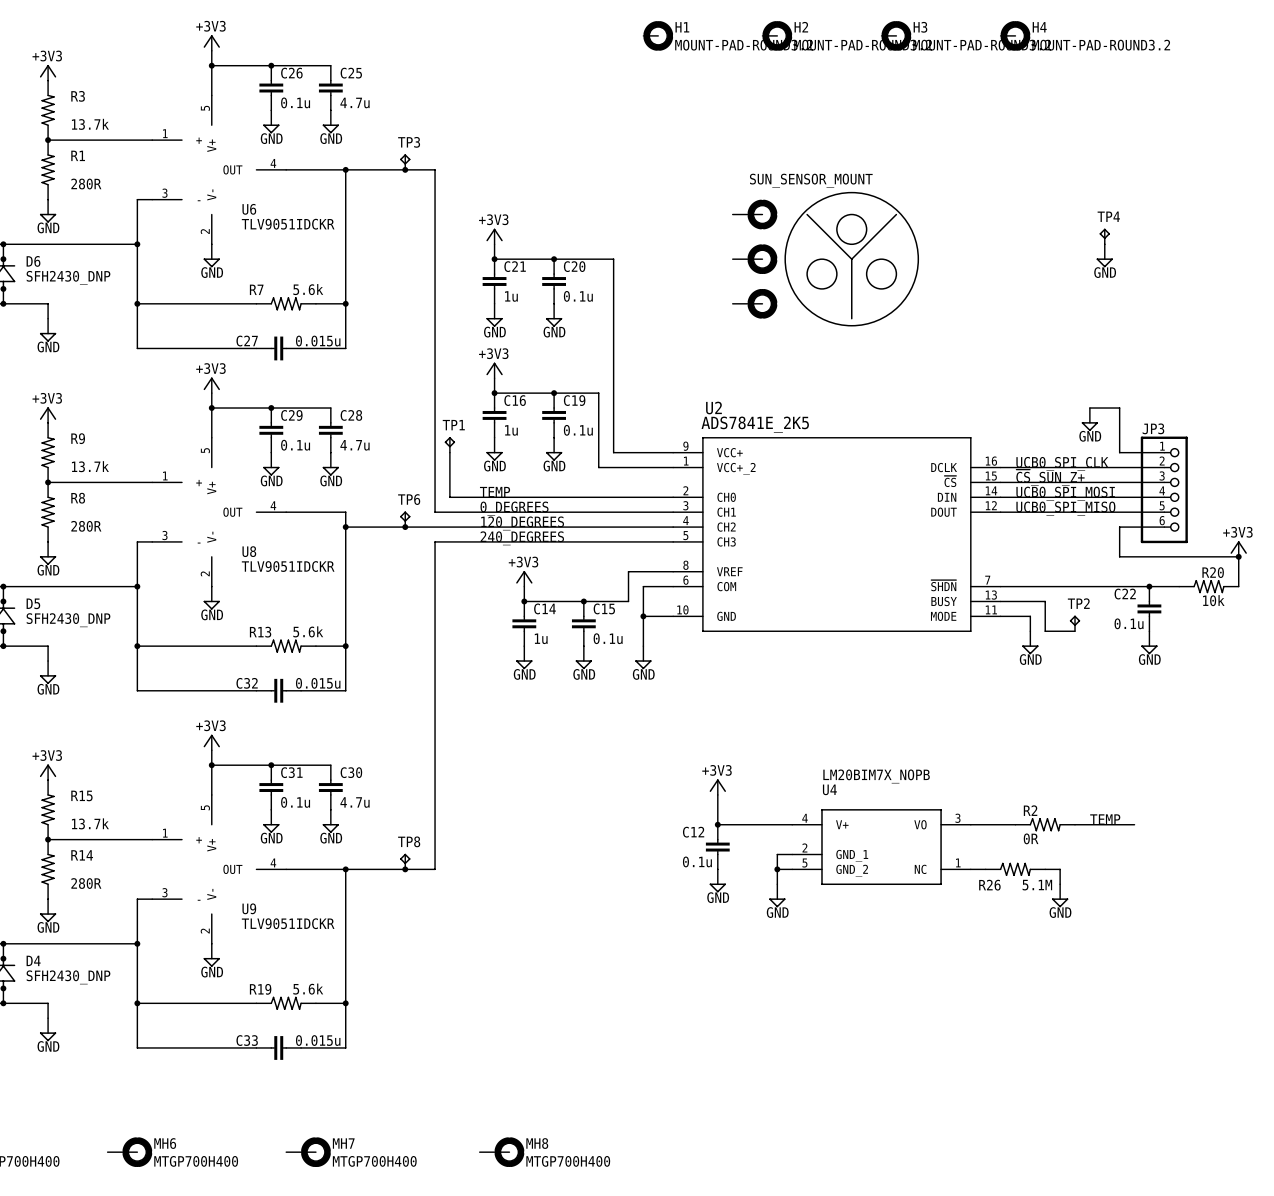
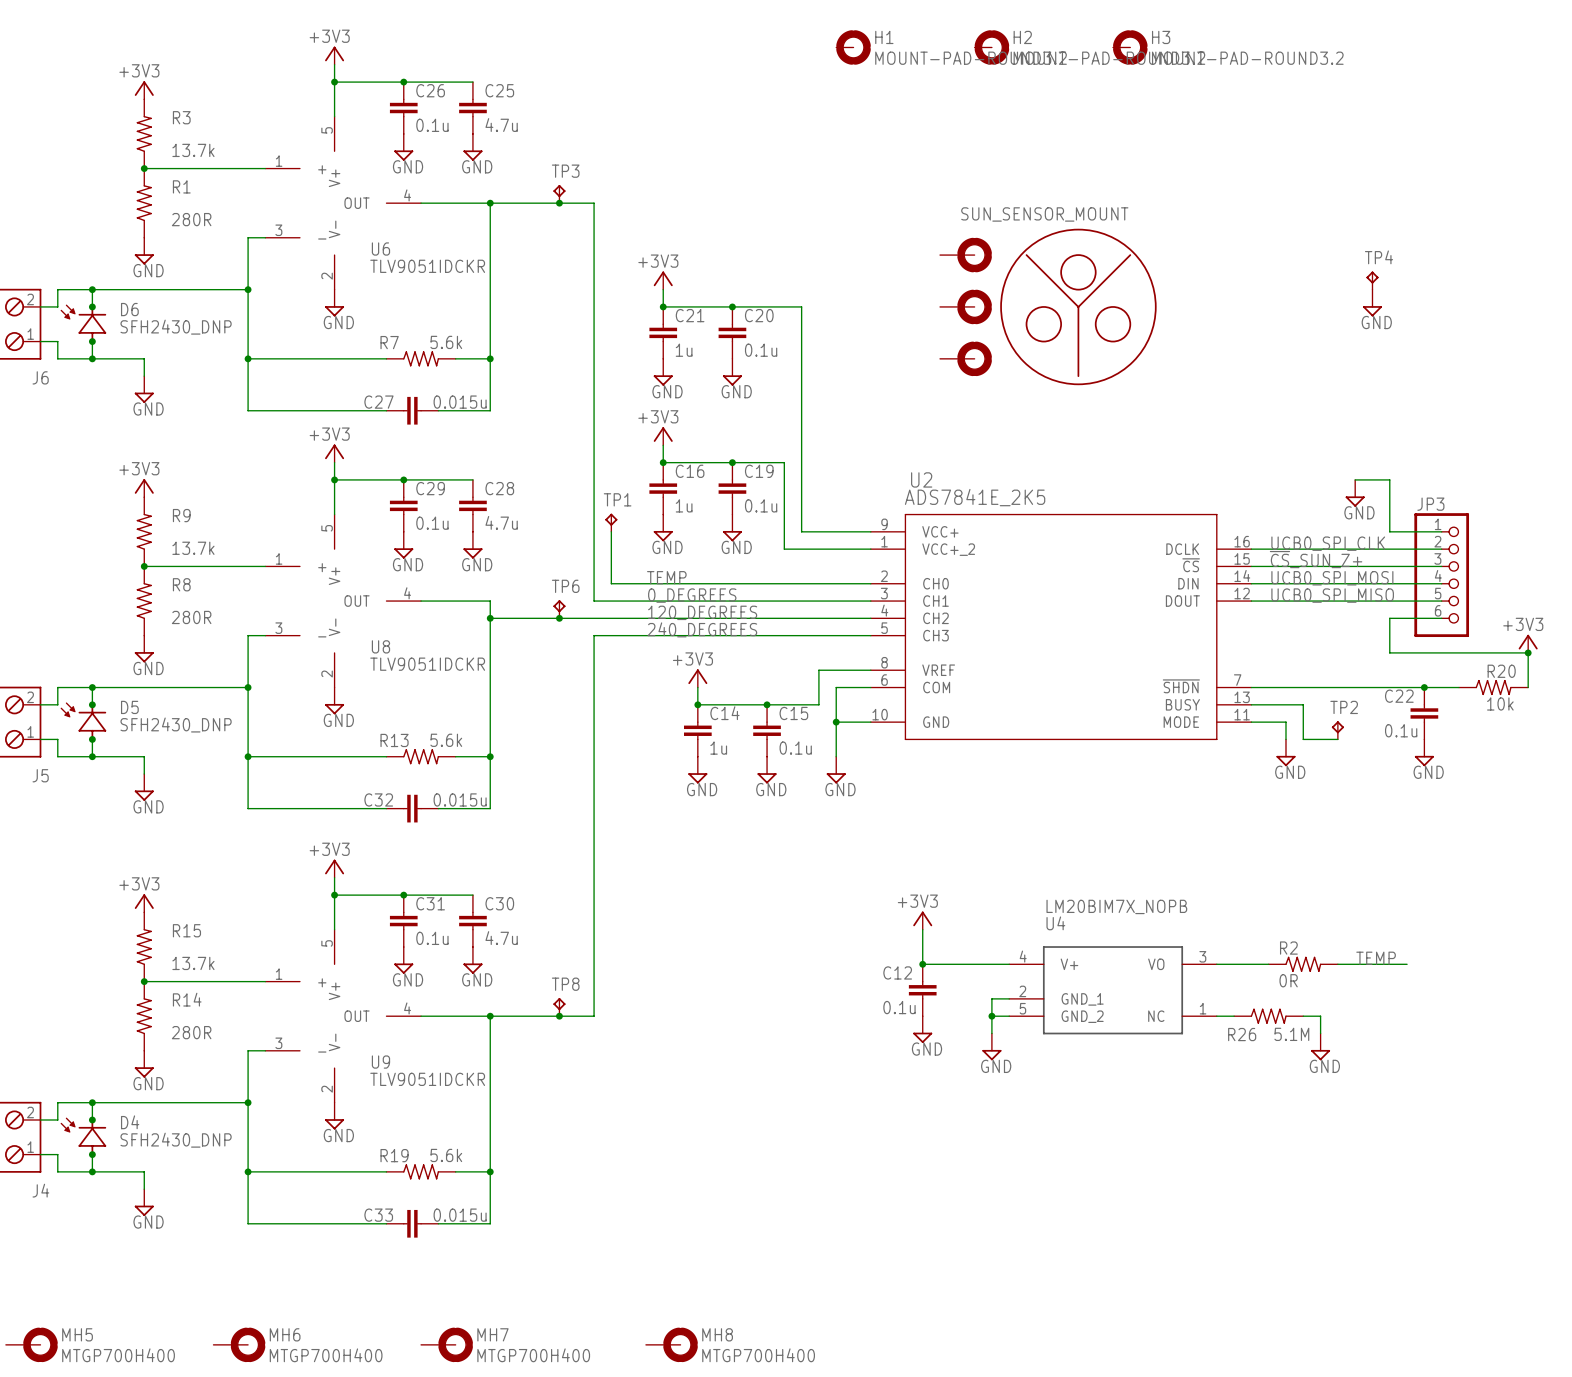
H4: MOUNT-PAD-ROUND3.2 (1015, 35) -> none

